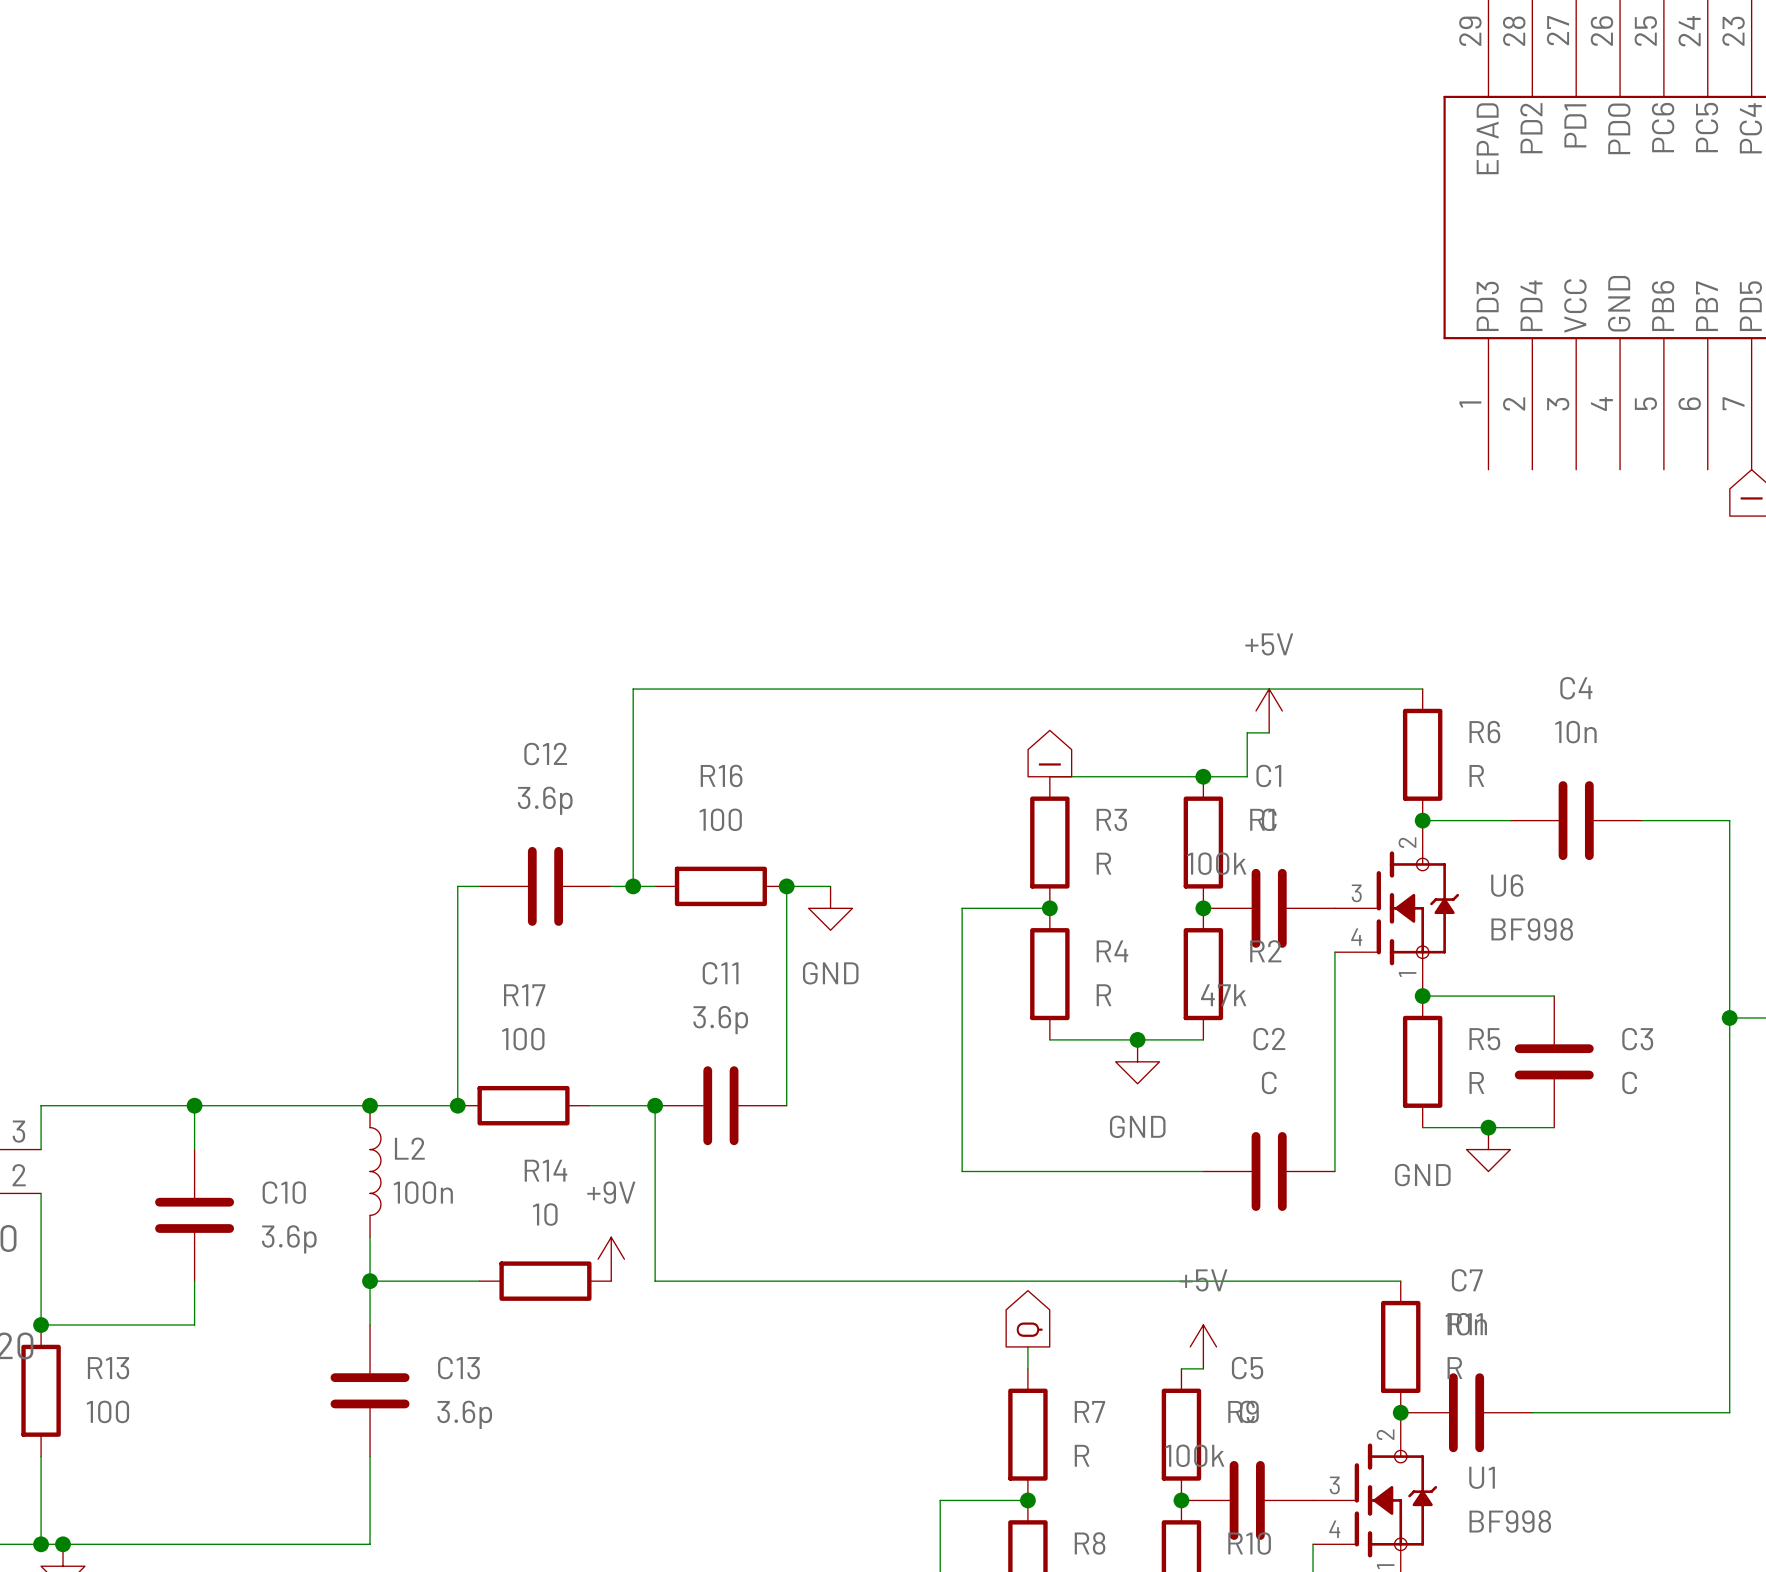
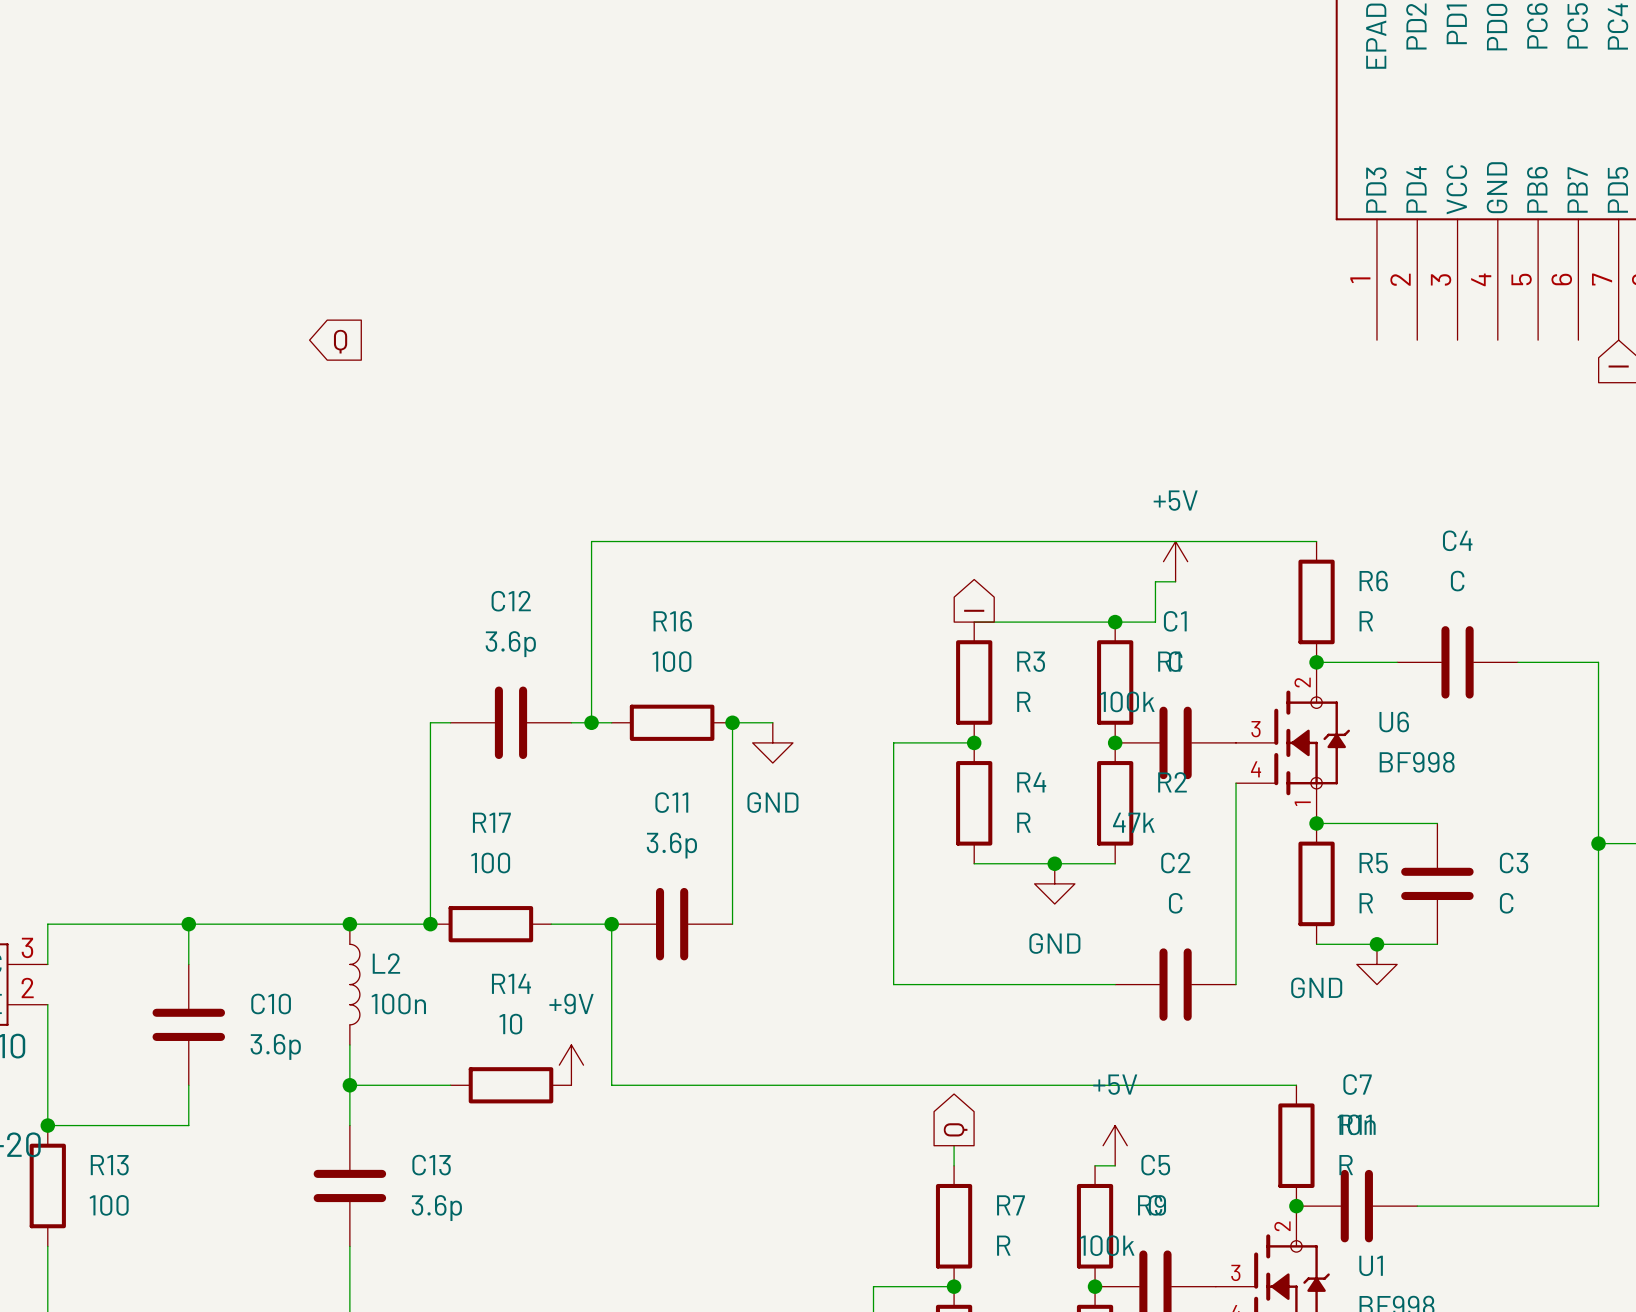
global label: none -> Q (340, 341)
C4 value: 10n (1575, 732) -> C (1457, 581)

